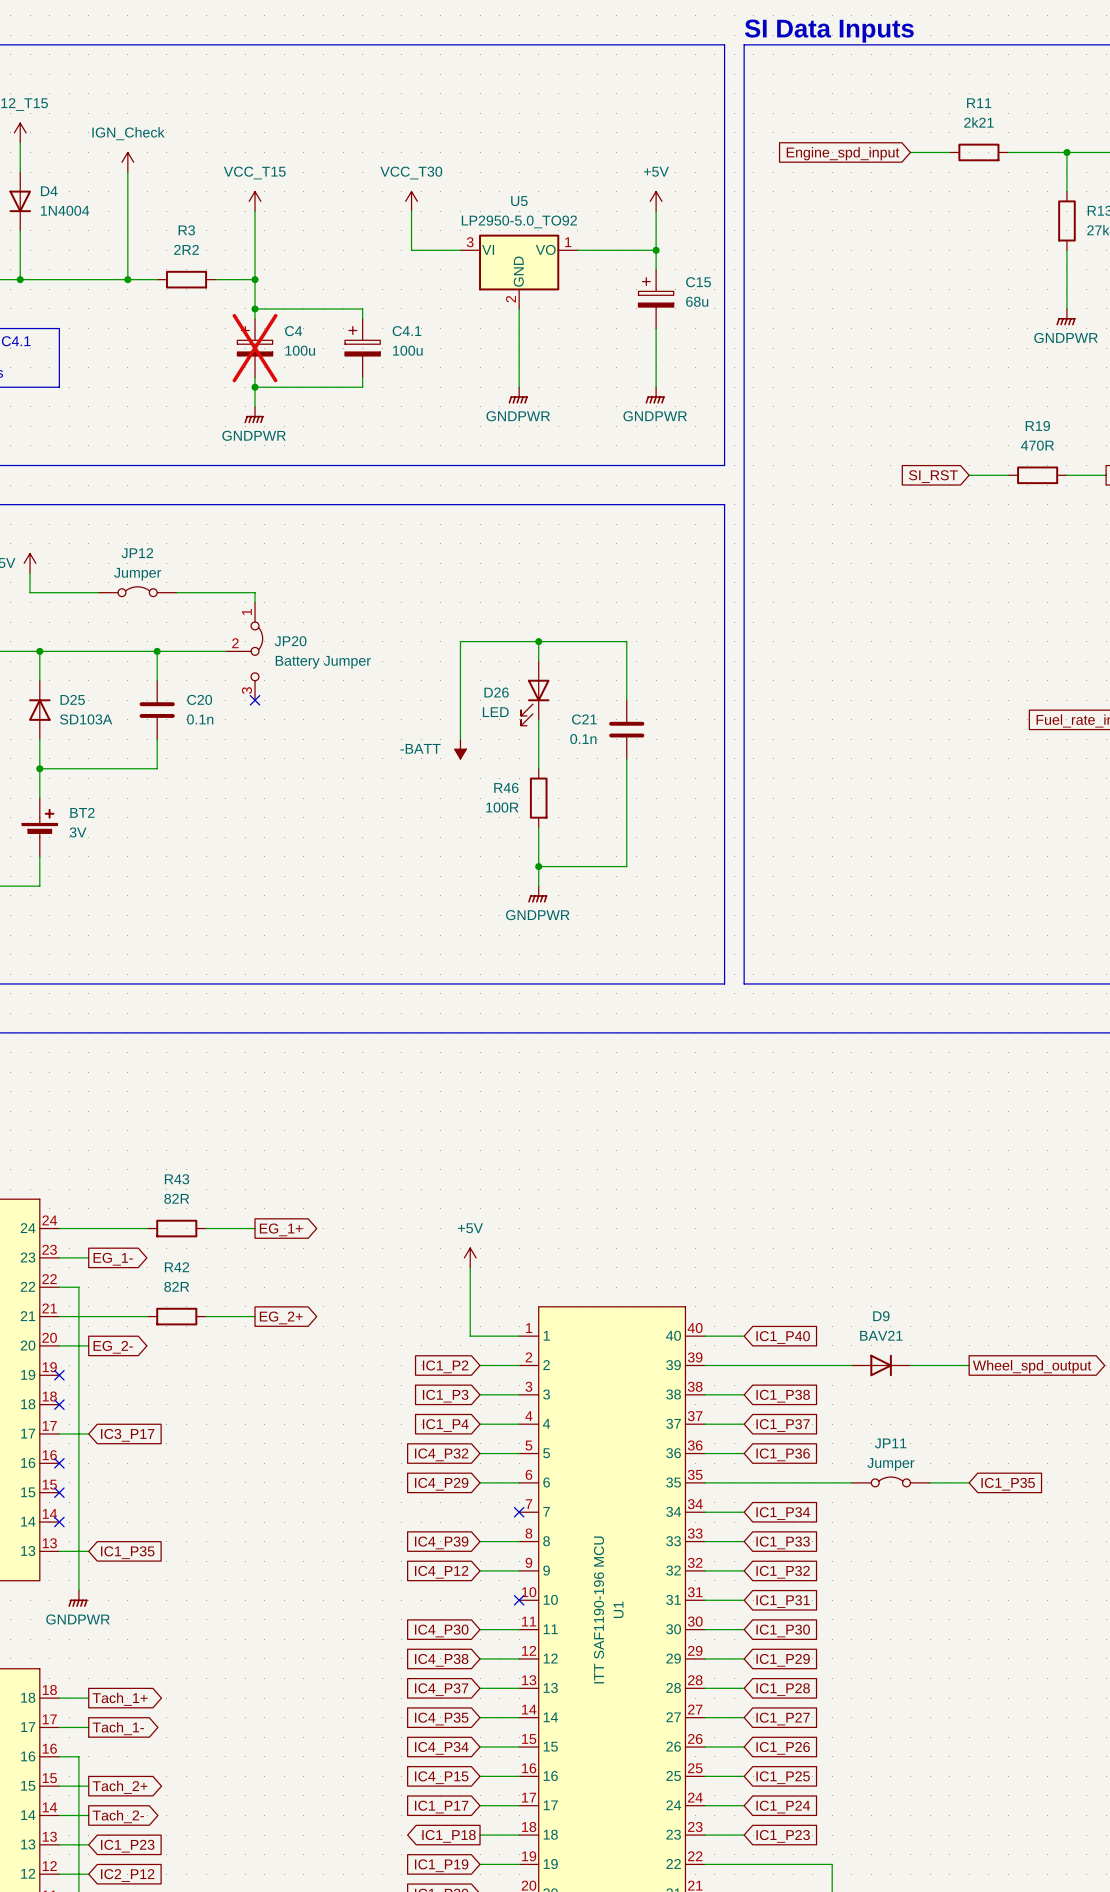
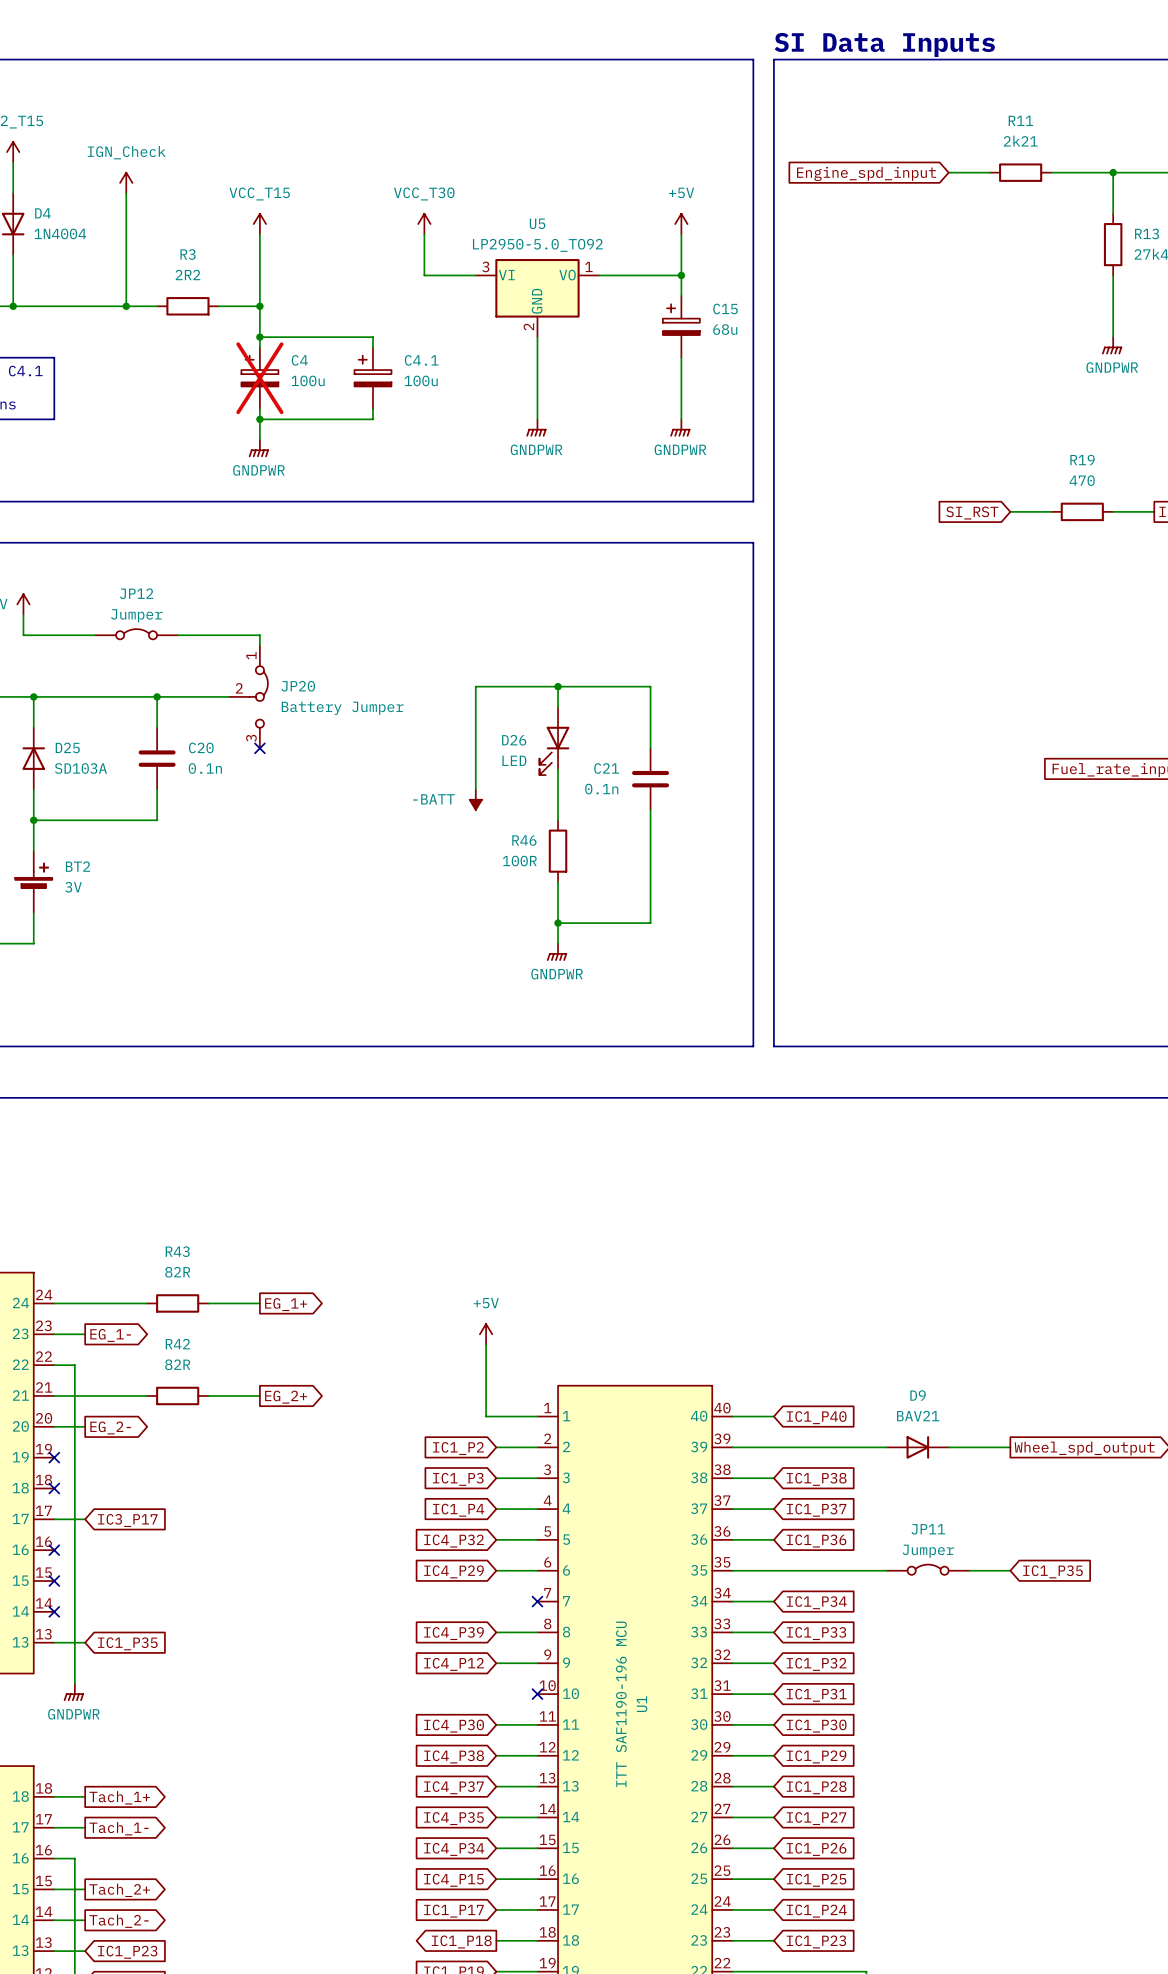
R19 value: 470R (1037, 445) -> 470 (1082, 480)

